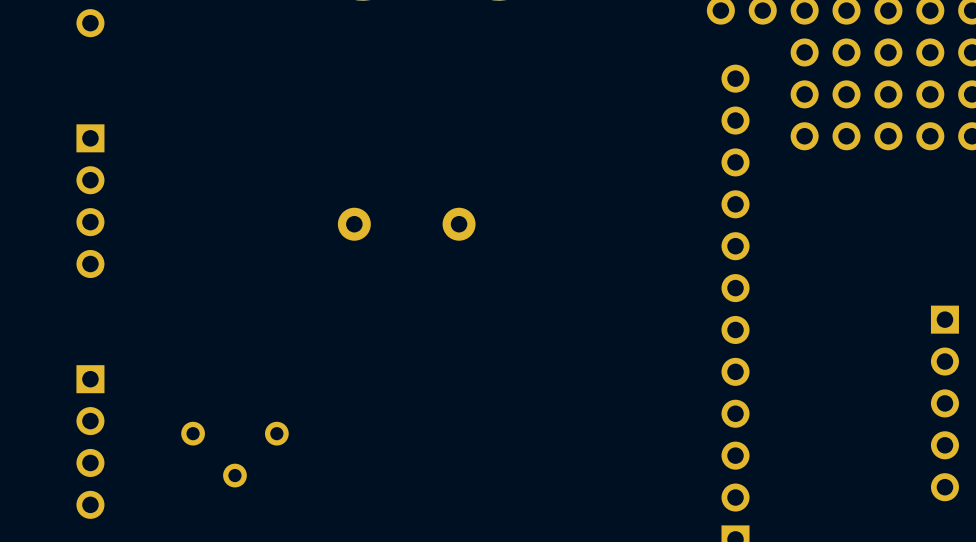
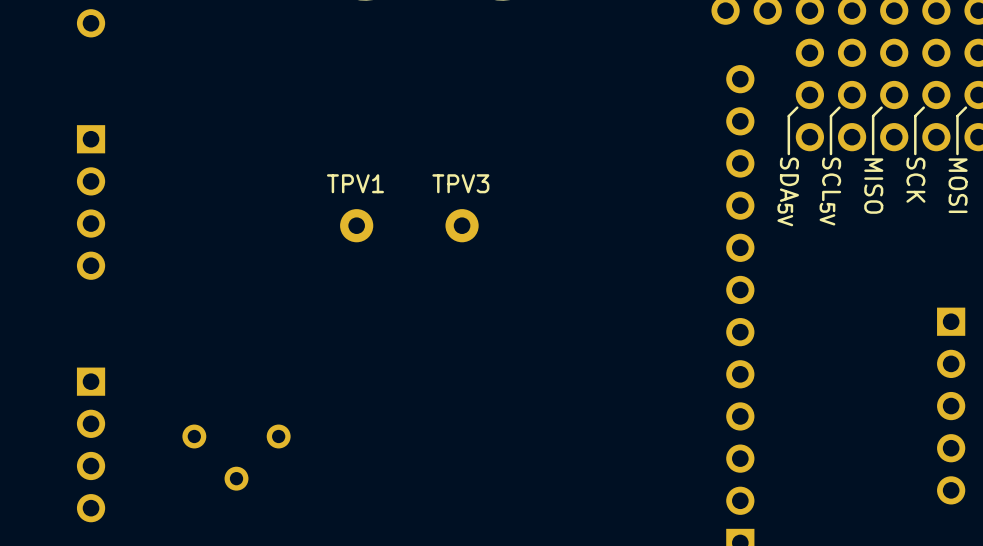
line: none -> (797, 107) (788, 116) (788, 154)
line: none -> (839, 107) (830, 116) (830, 154)
line: none -> (881, 107) (873, 116) (873, 154)
line: none -> (923, 107) (915, 116) (915, 154)
line: none -> (965, 107) (957, 116) (957, 154)
text: none -> SCK (915, 180)
text: none -> MOSI (958, 185)
text: none -> MISO (873, 186)
text: none -> TPV1 (355, 183)
text: none -> TPV3 (460, 183)
text: none -> SDA5V (788, 191)
text: none -> SCL5V (830, 191)

